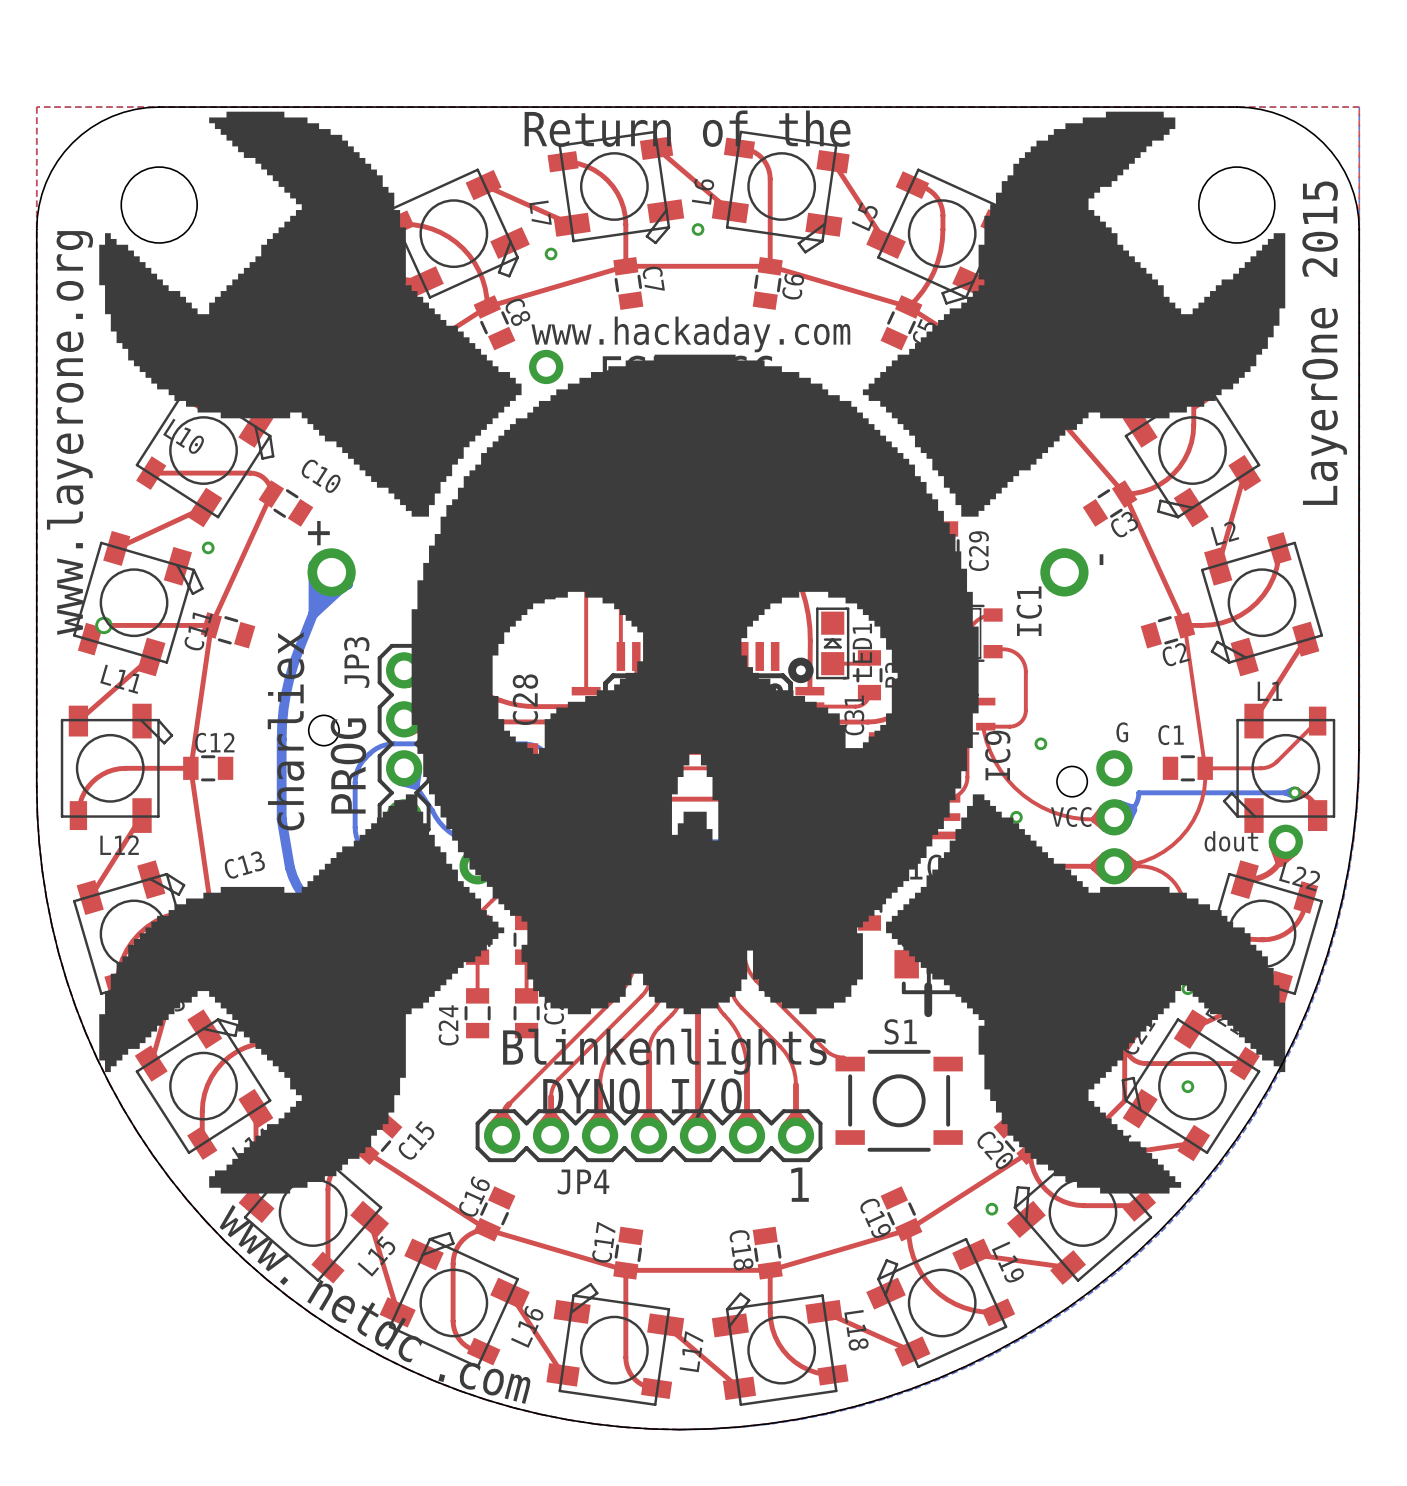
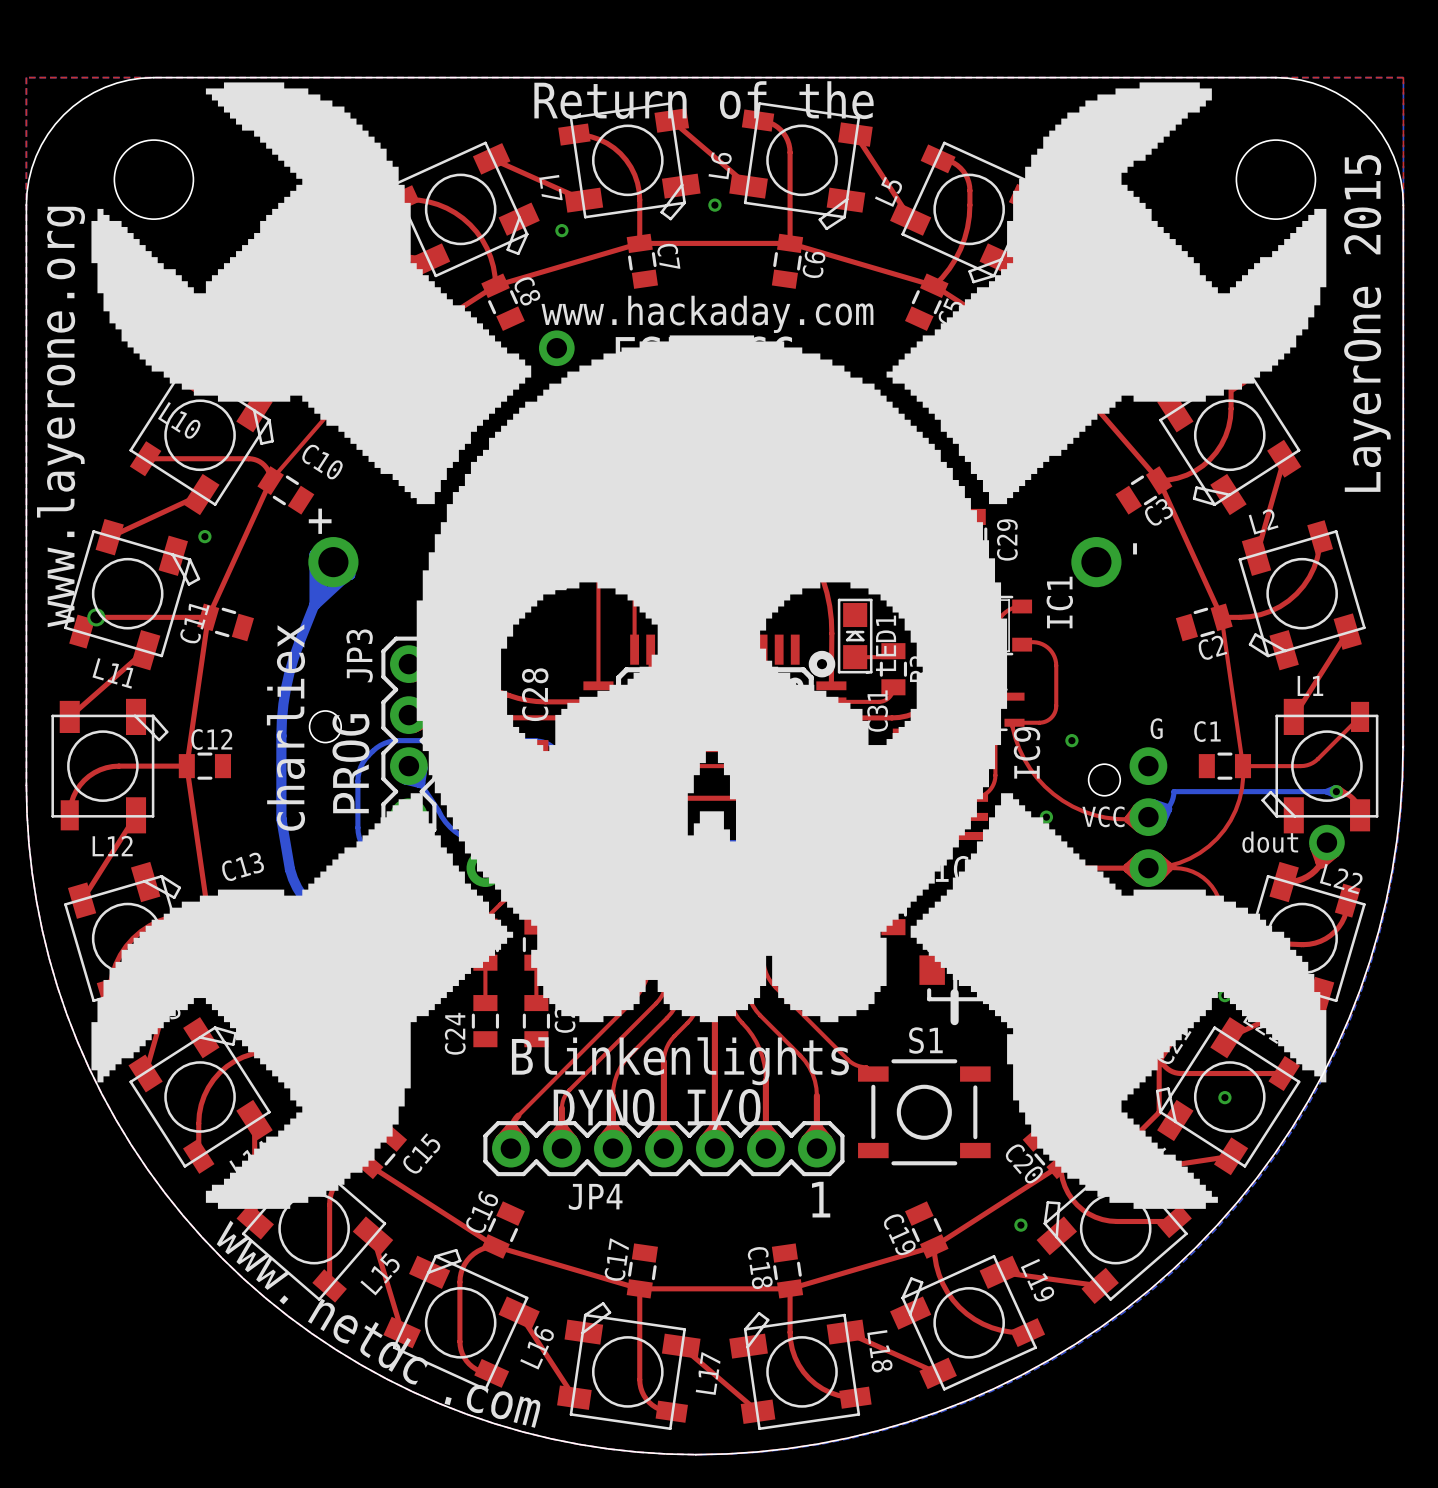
top track: none -> (368, 368) (270, 480)

